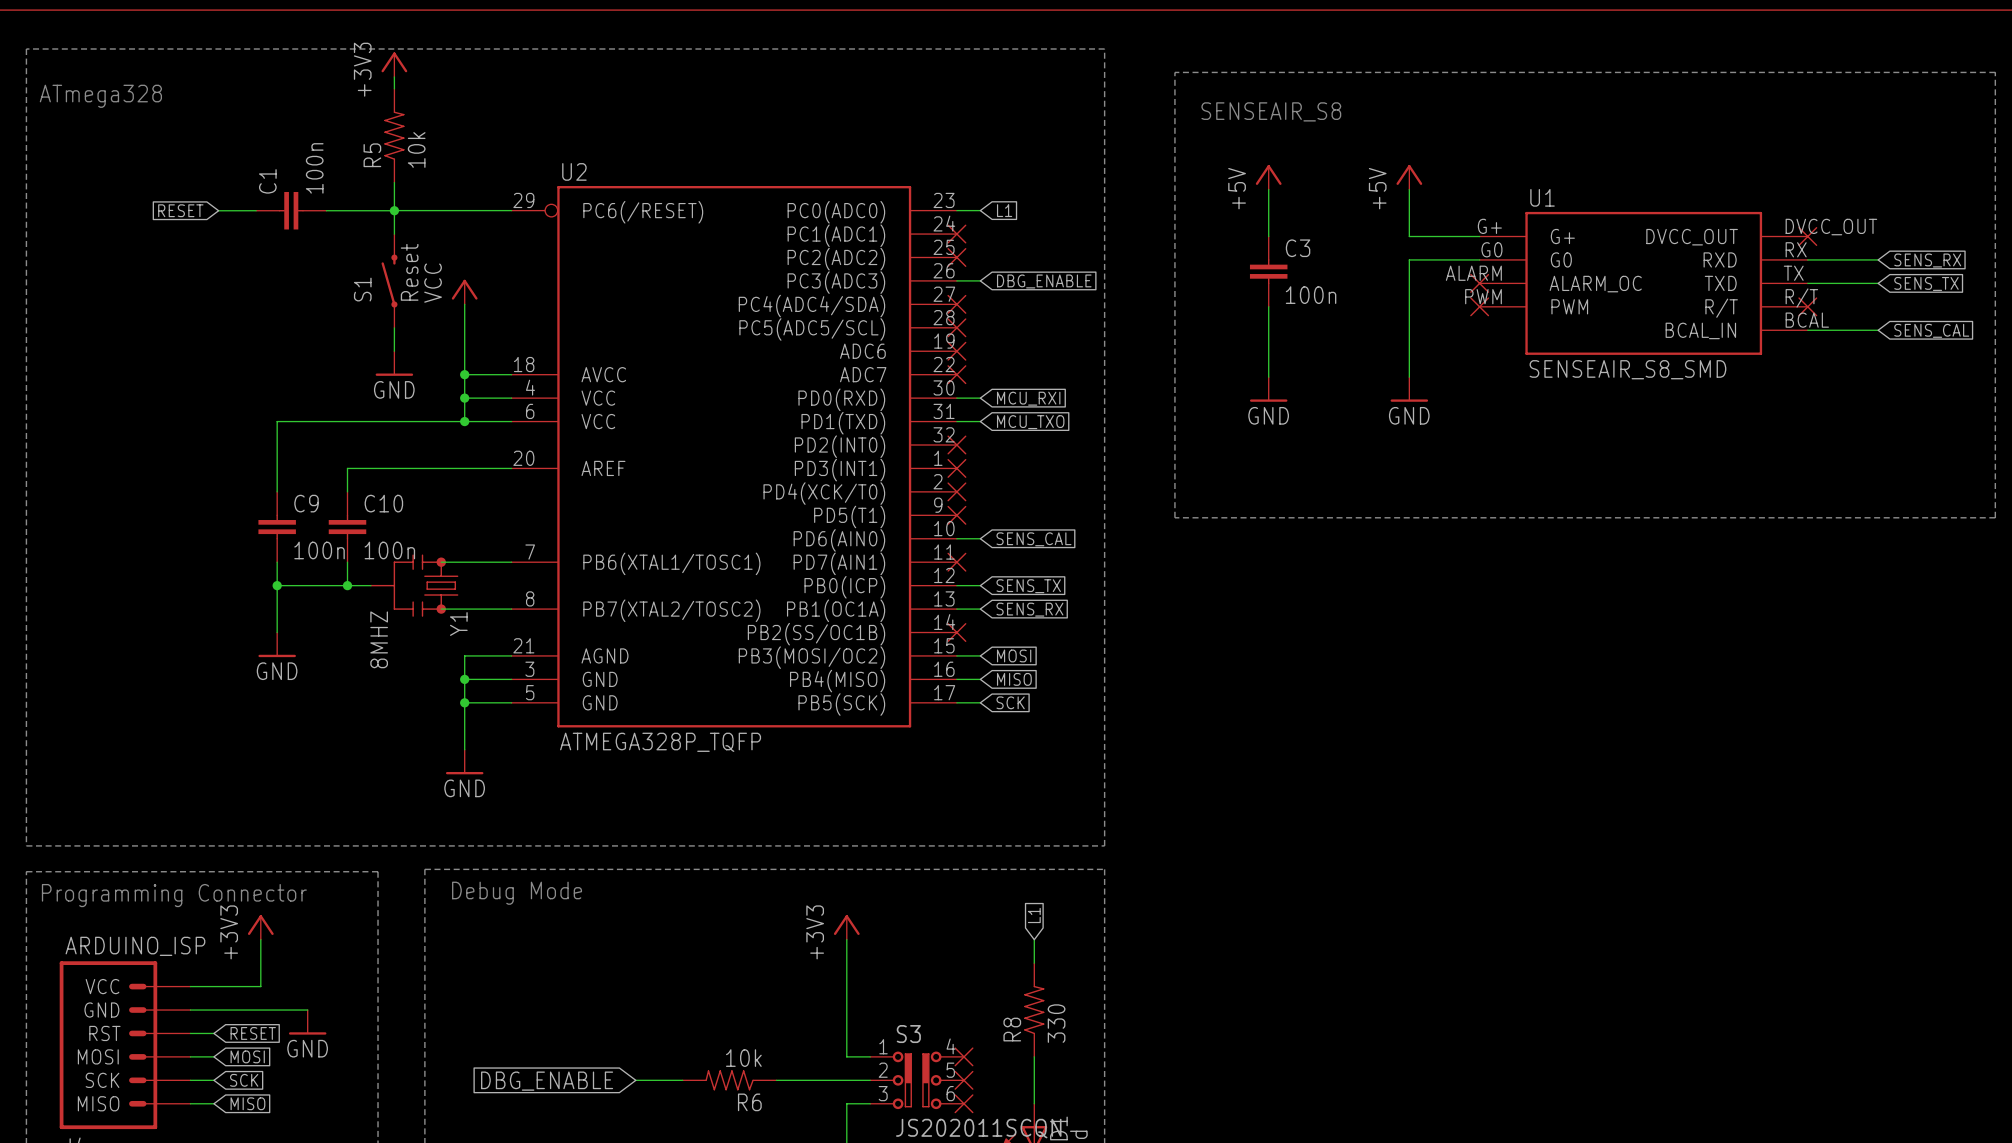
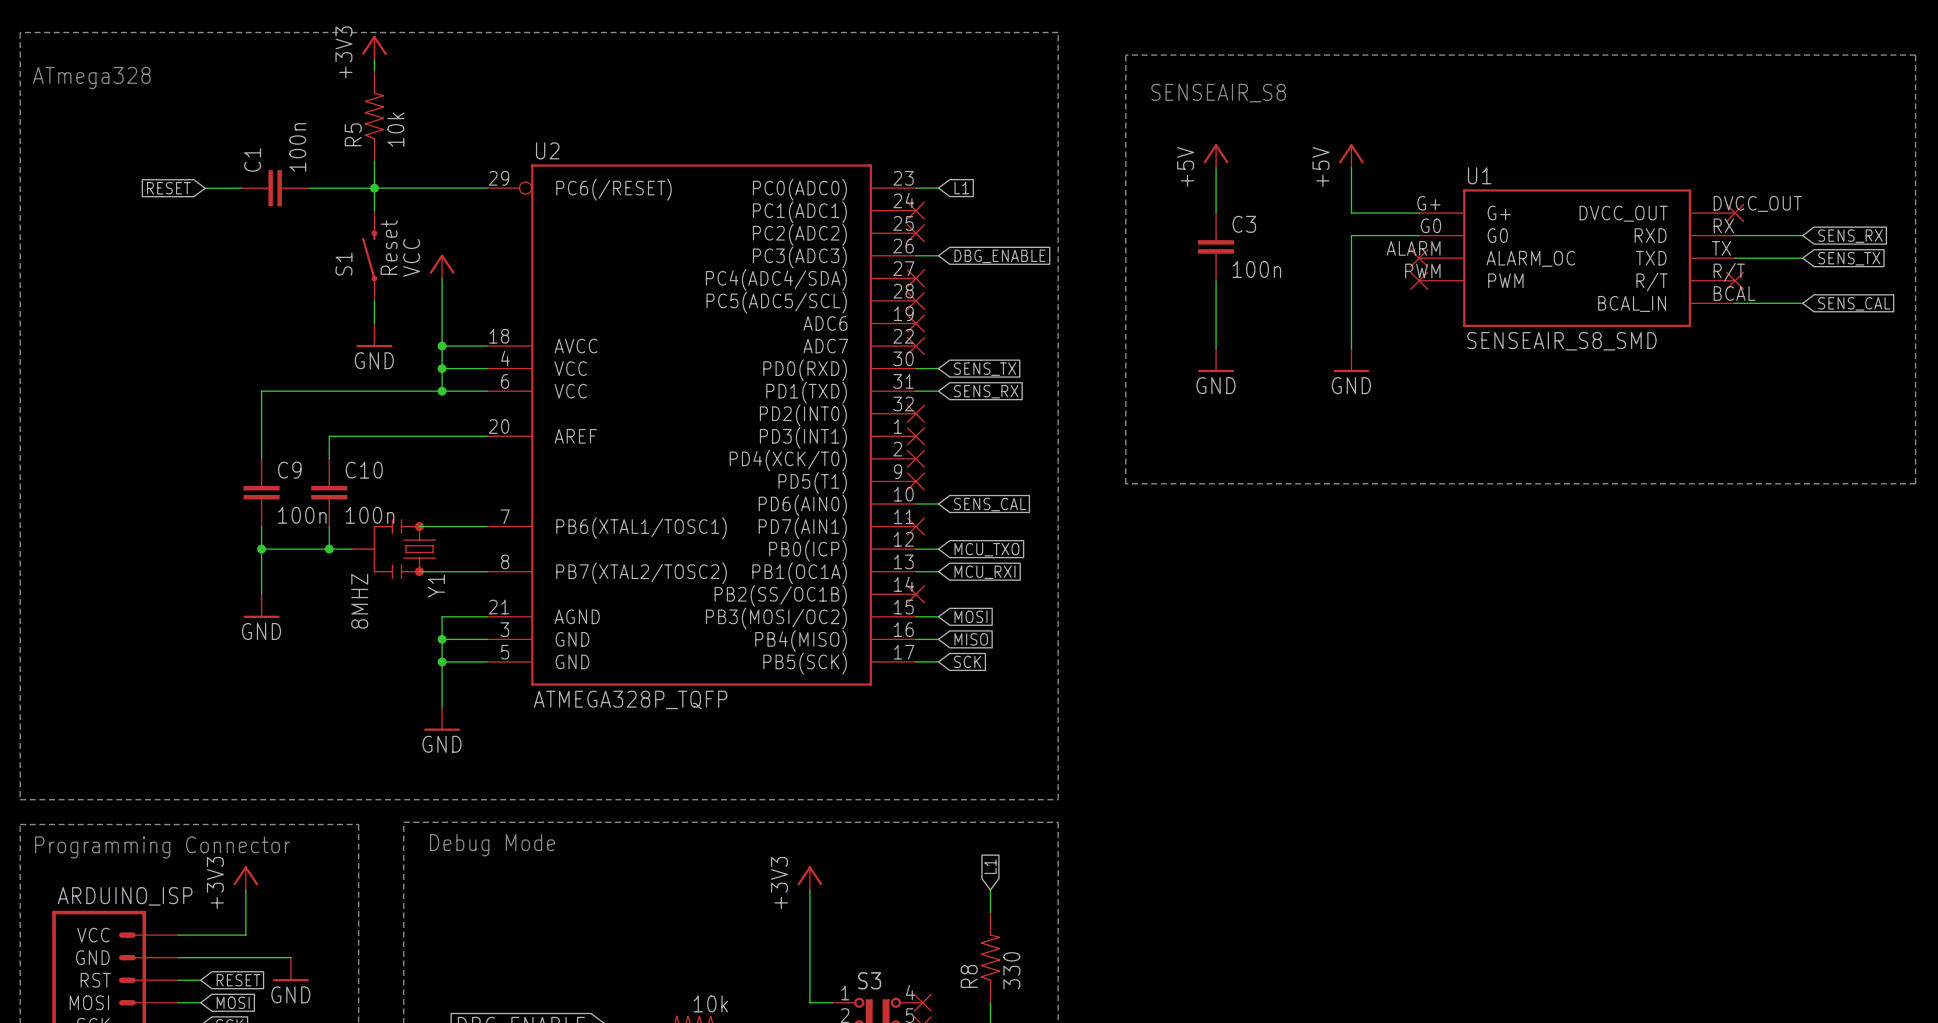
global label: MCU_RXI (1028, 398) -> SENS_TX (985, 369)
global label: MCU_TXO (1030, 422) -> SENS_RX (986, 391)
global label: SENS_TX (1028, 586) -> MCU_TXO (986, 549)
global label: SENS_RX (1029, 609) -> MCU_RXI (985, 572)

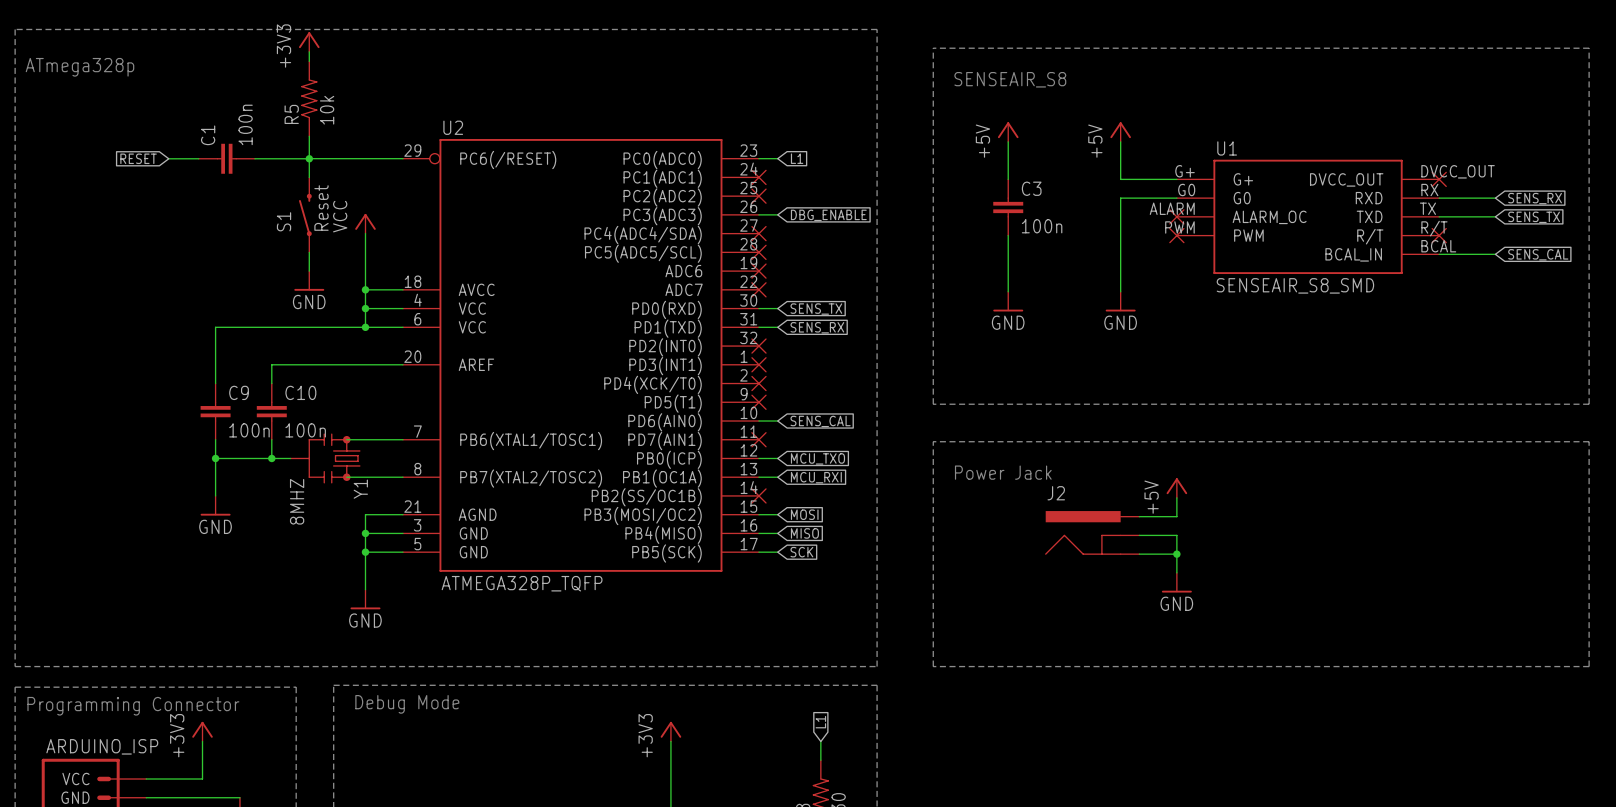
text: ATmega328 (91, 78) -> ATmega328p (79, 67)
line: none -> (933, 441) (1589, 441) (1589, 666) (933, 666) (933, 441)
text: none -> Power Jack (1003, 472)
power symbol: none -> +5V (1176, 488)
wire: none -> (1176, 497) (1176, 516) (1139, 516)
J2: none -> (1092, 532)
wire: none -> (1139, 535) (1176, 535) (1176, 572)
wire: none -> (1139, 554) (1176, 554)
junction: none -> (1176, 554)
power symbol: none -> GND (1176, 582)

